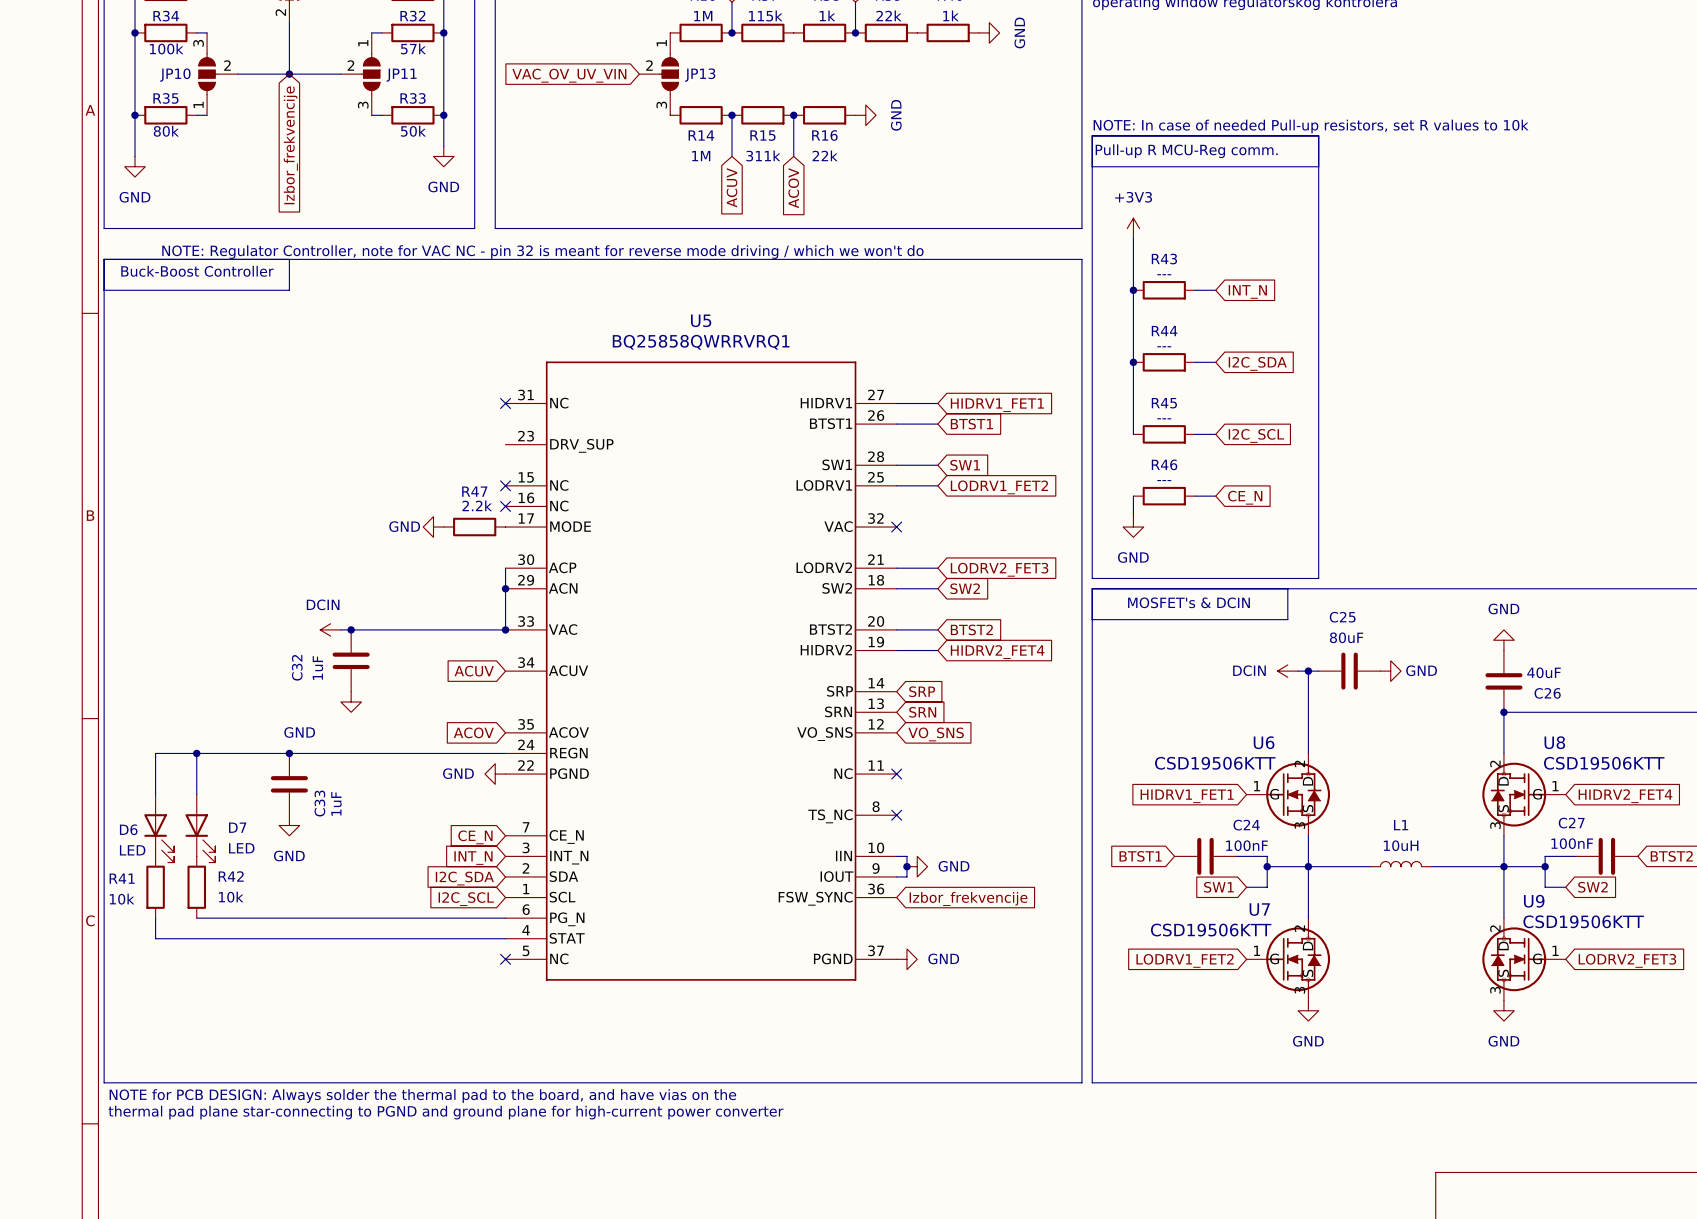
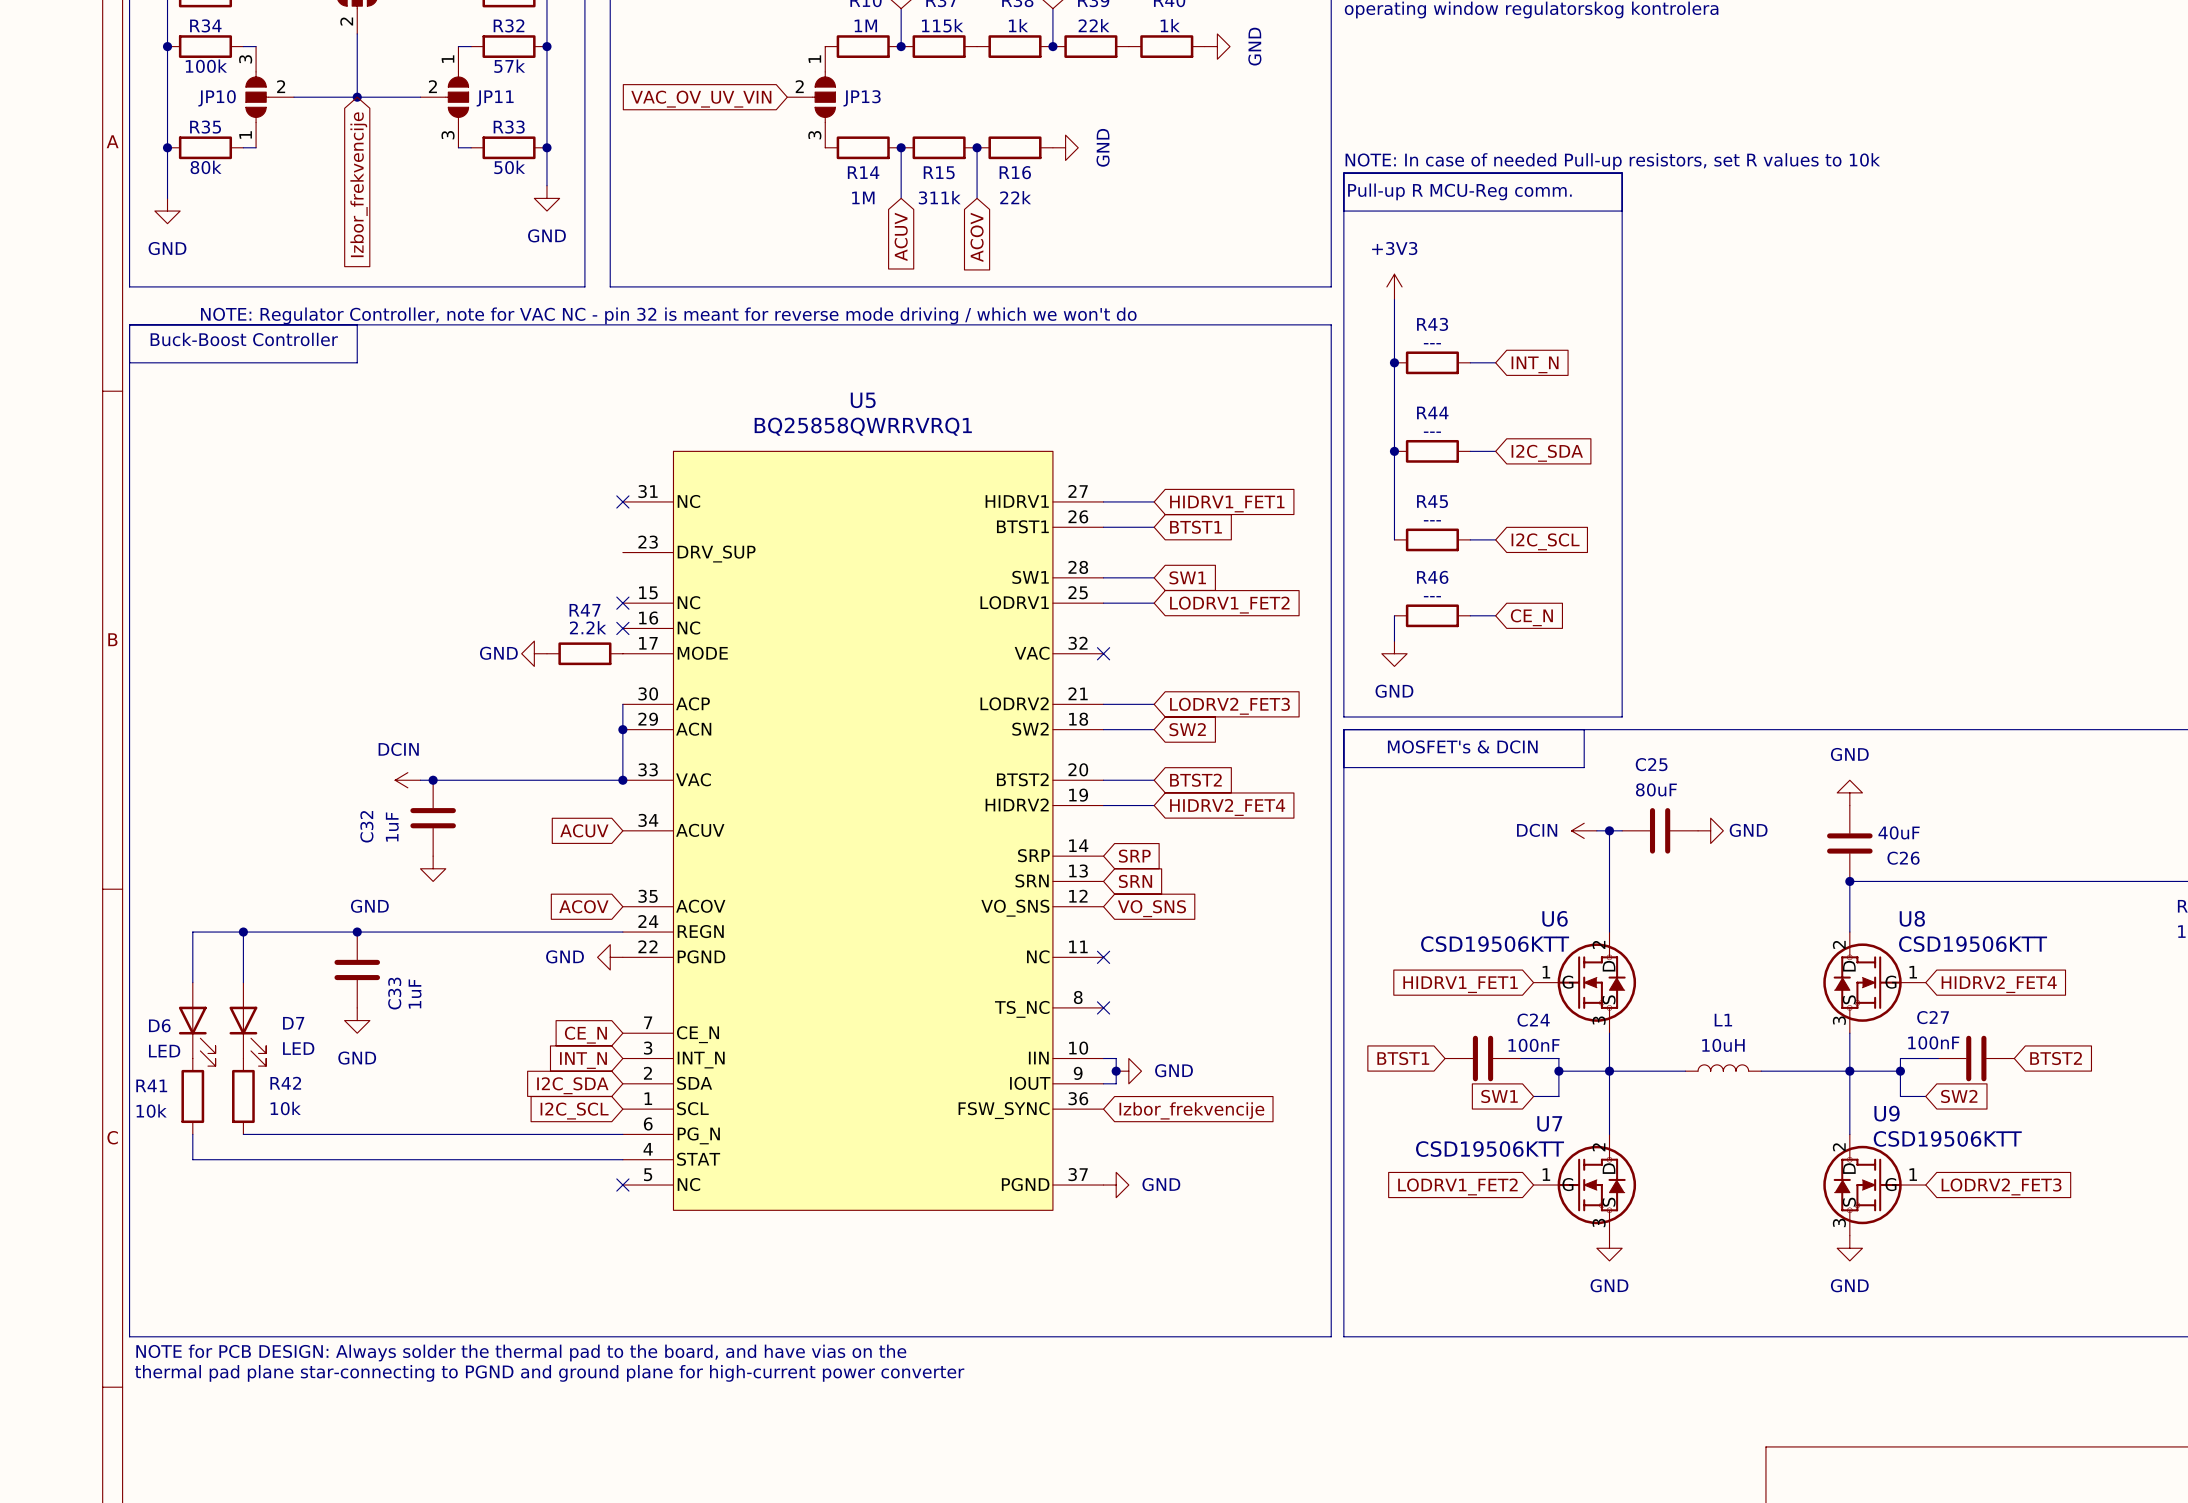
U5 symbol: [505, 361, 897, 981] -> [622, 451, 1104, 1211]

